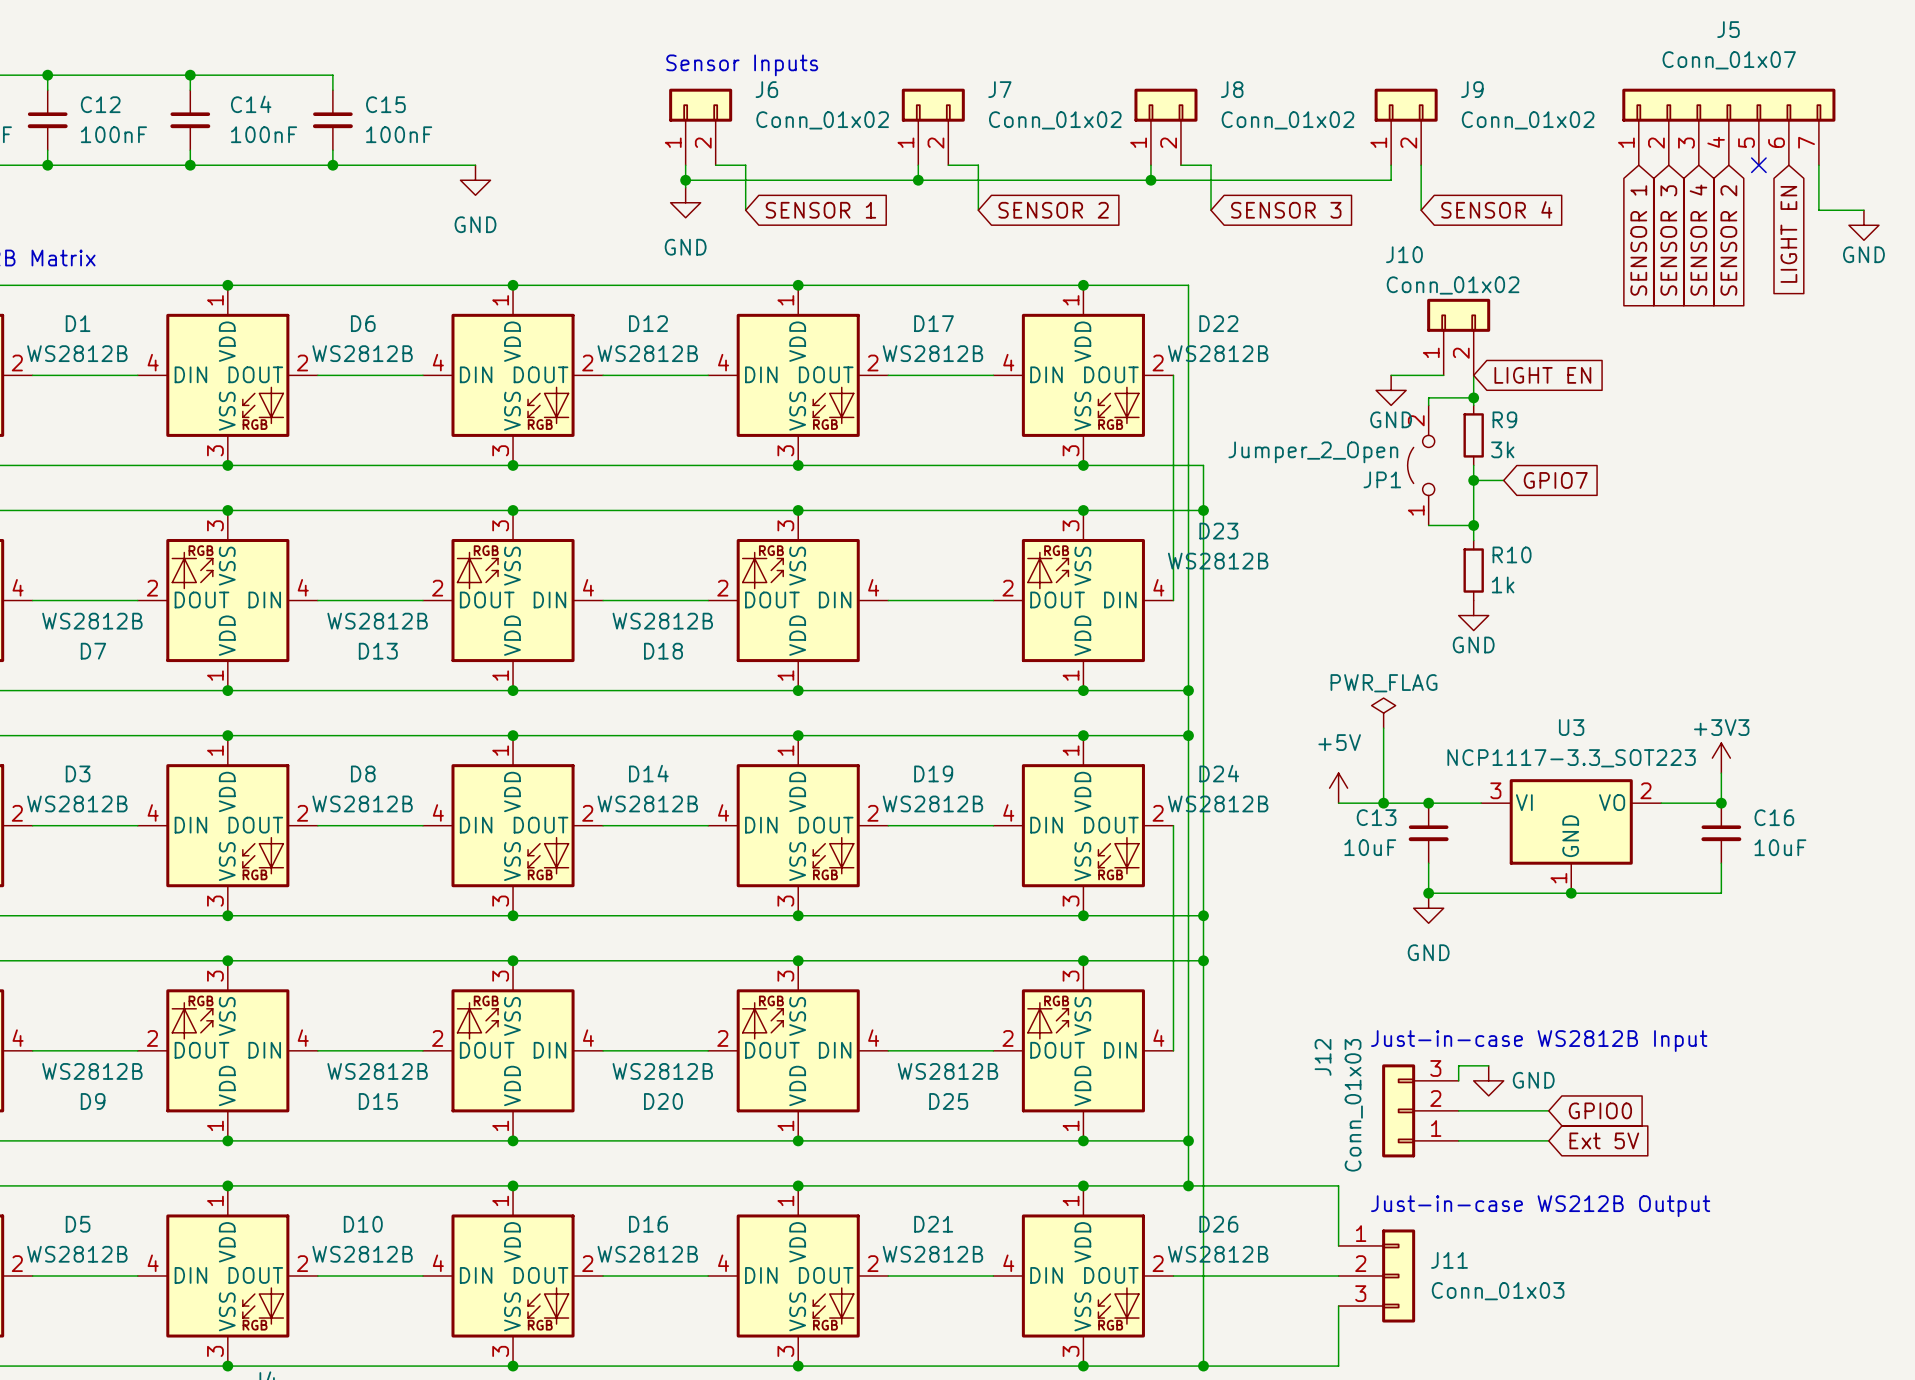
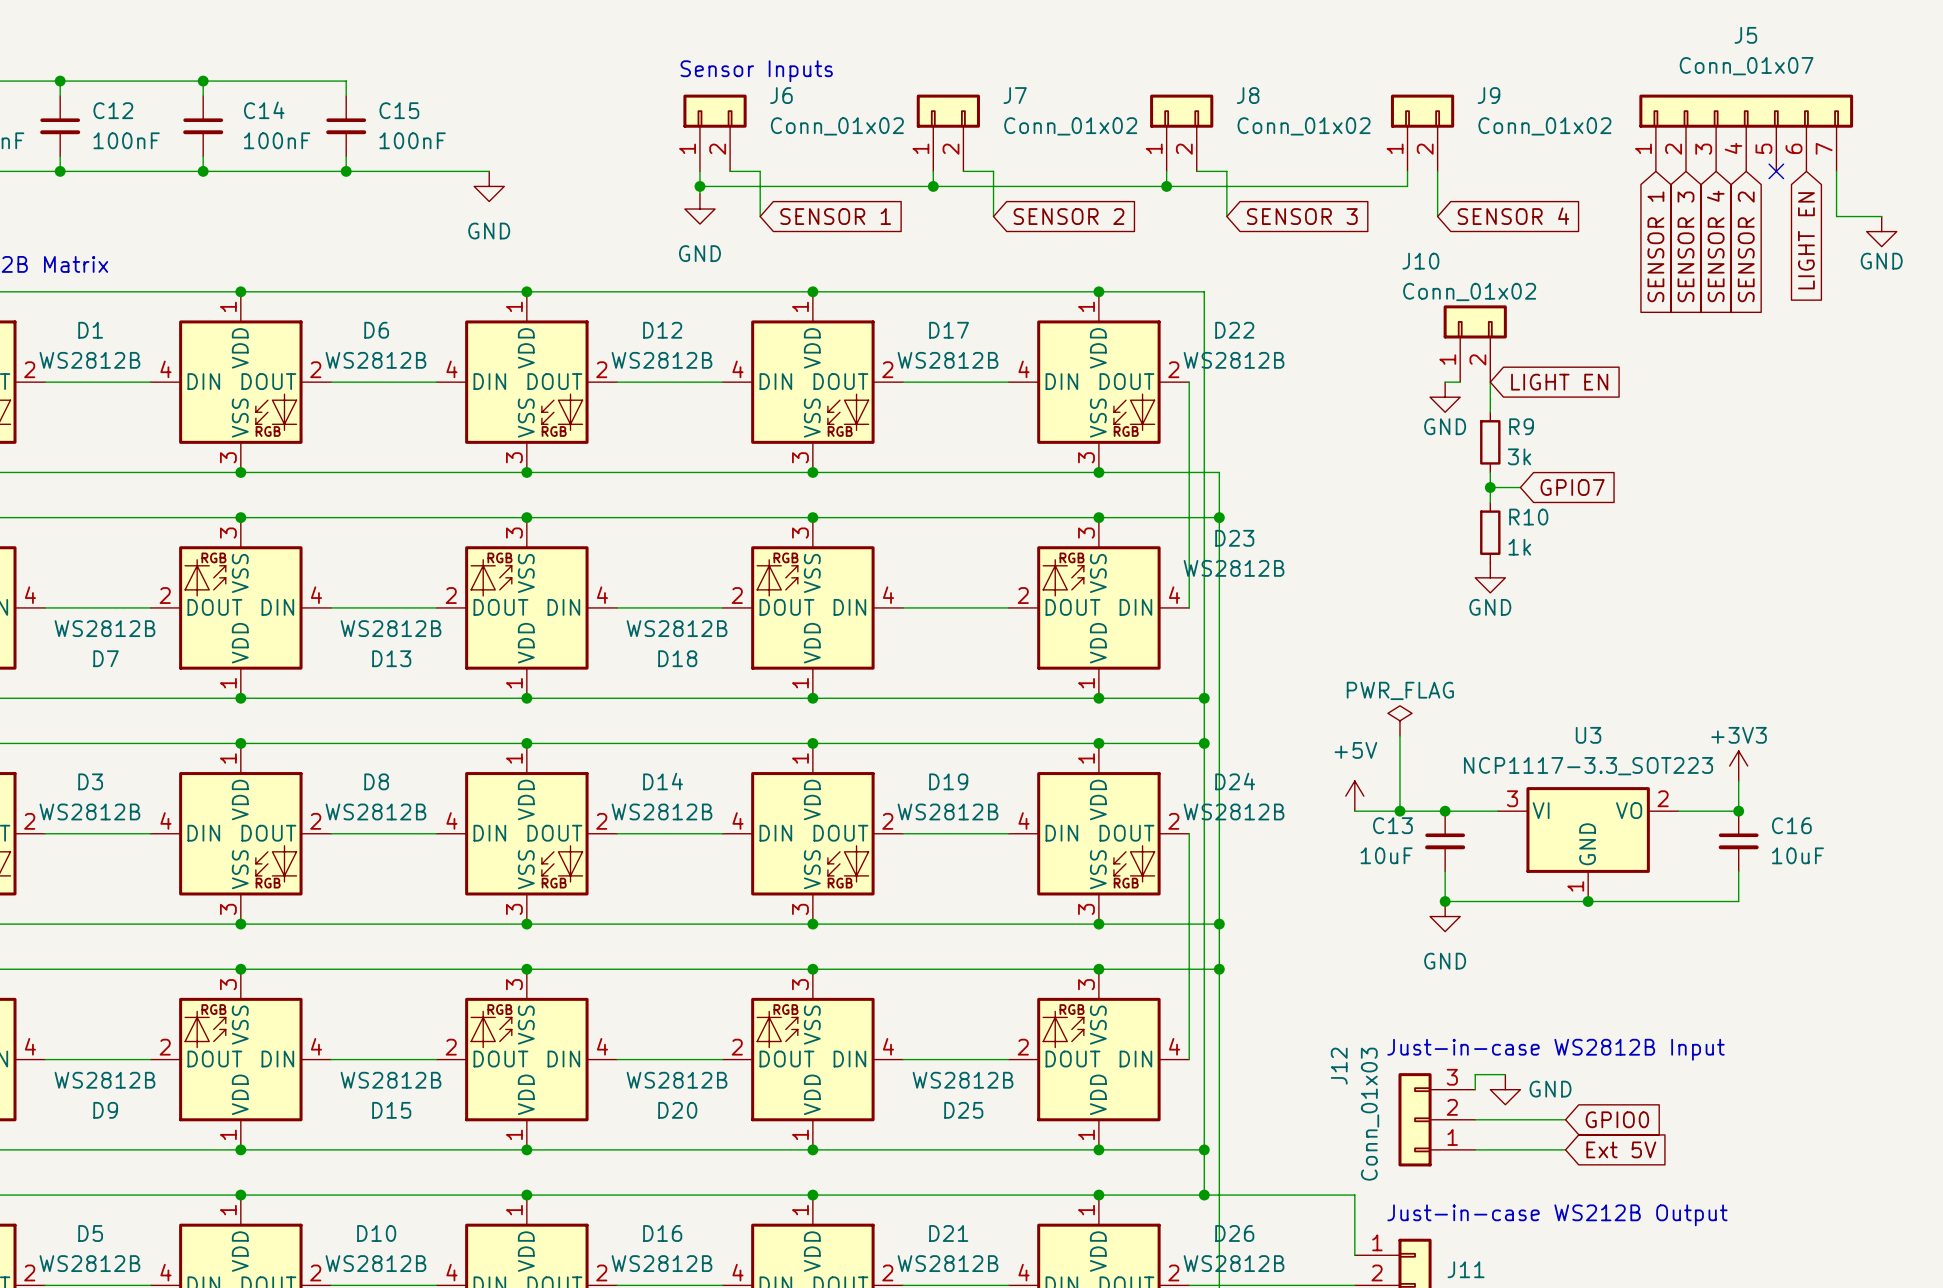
wire: (1391, 375) (1428, 375) -> none
power symbol position: GND (1391, 390) -> GND (1445, 397)
wire: (1473, 397) (1428, 397) (1428, 405) -> none
junction: (1473, 397) -> none
JP1: Jumper_2_Open (1421, 465) -> none
wire: (1473, 495) (1473, 540) -> none
wire: (1428, 525) (1473, 525) -> none
junction: (1473, 525) -> none
R10 position: (1473, 570) -> (1490, 532)
power symbol position: GND (1473, 615) -> GND (1490, 577)

